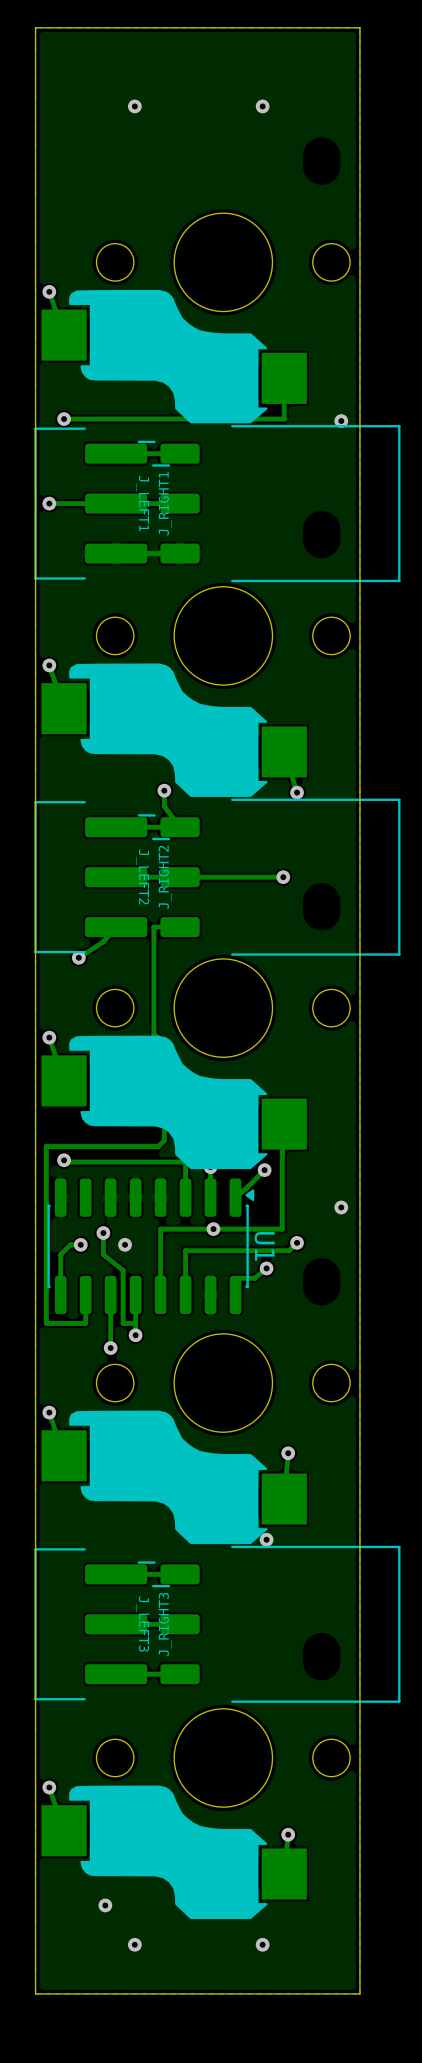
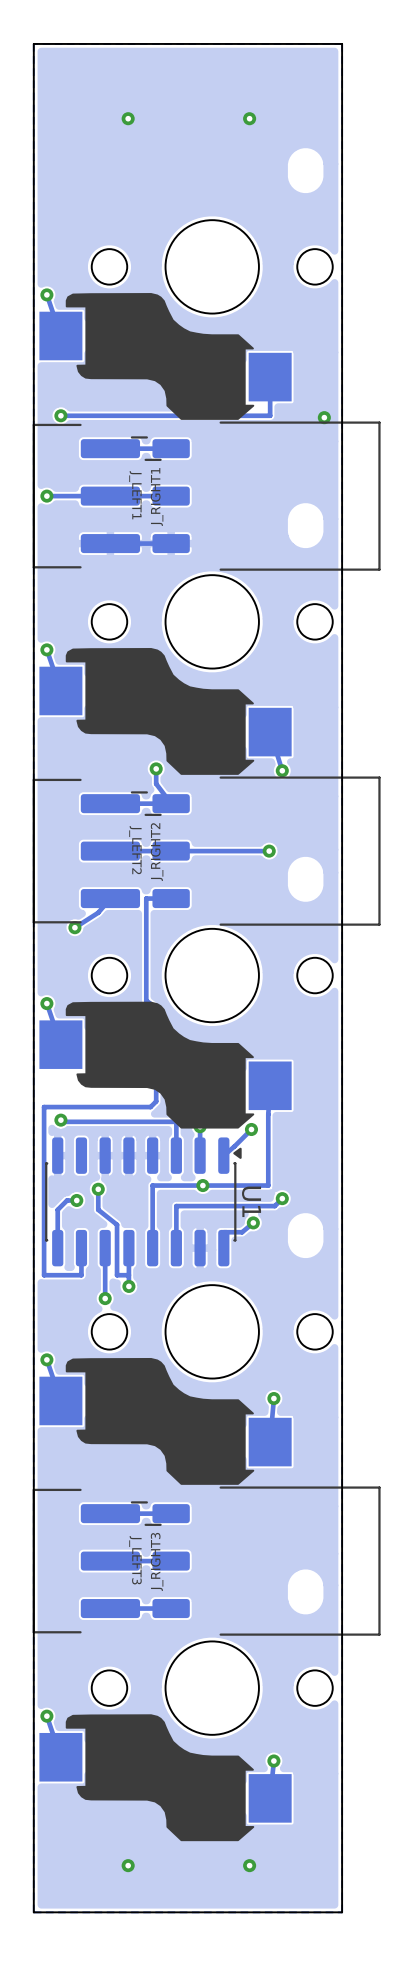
via: (341, 1207) -> none
via: (125, 1244) -> none
via: (266, 1539) -> none
via: (105, 1905) -> none

